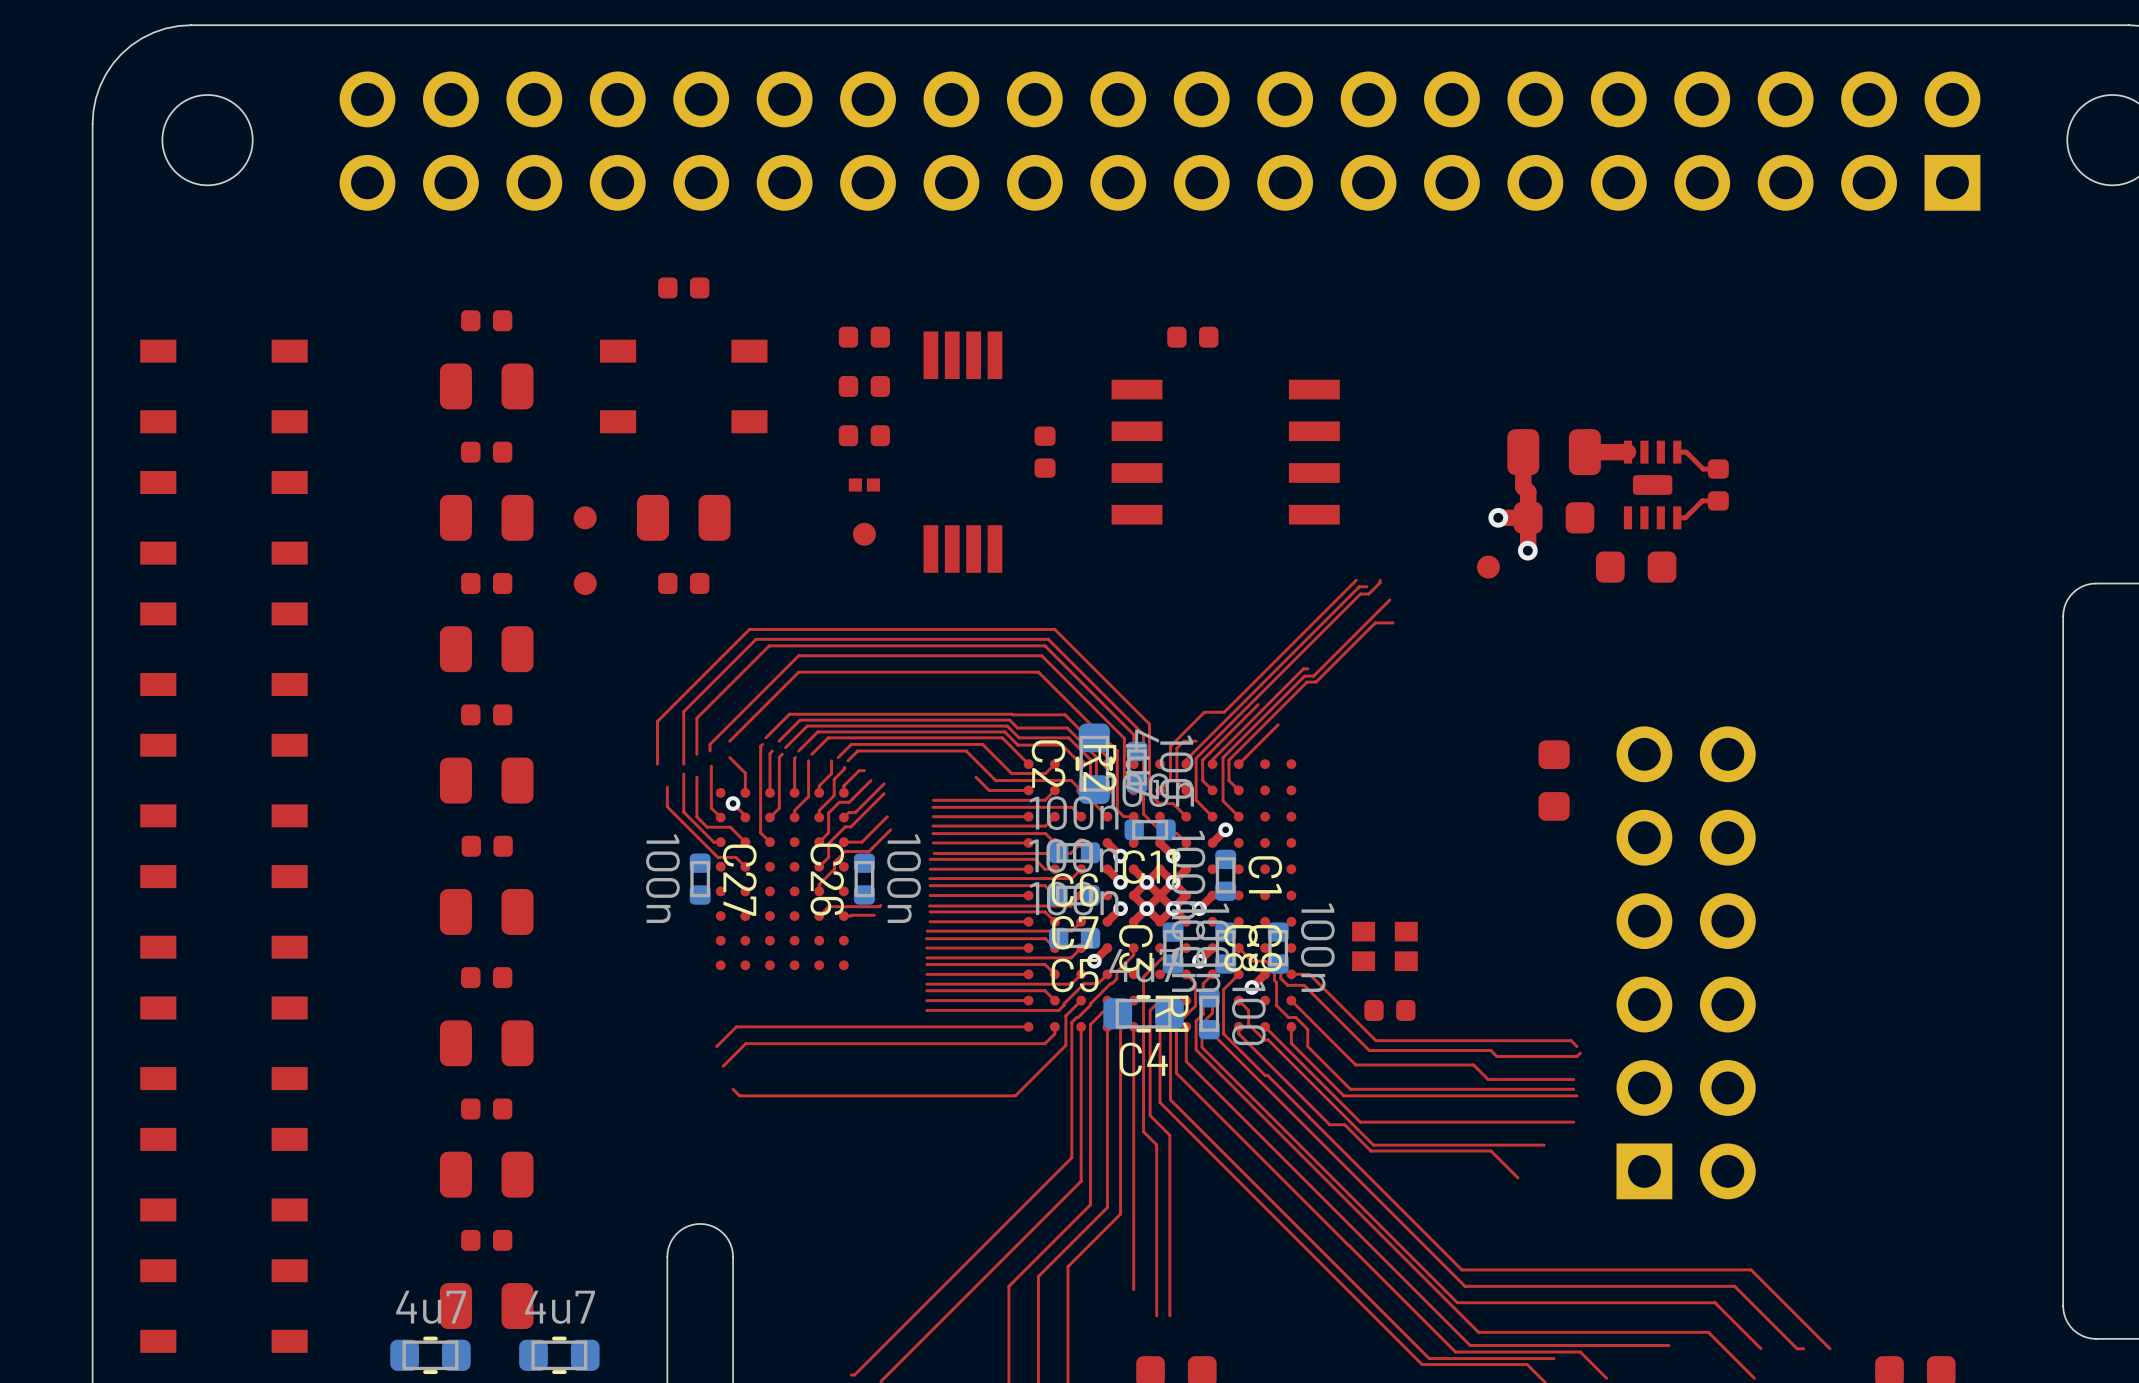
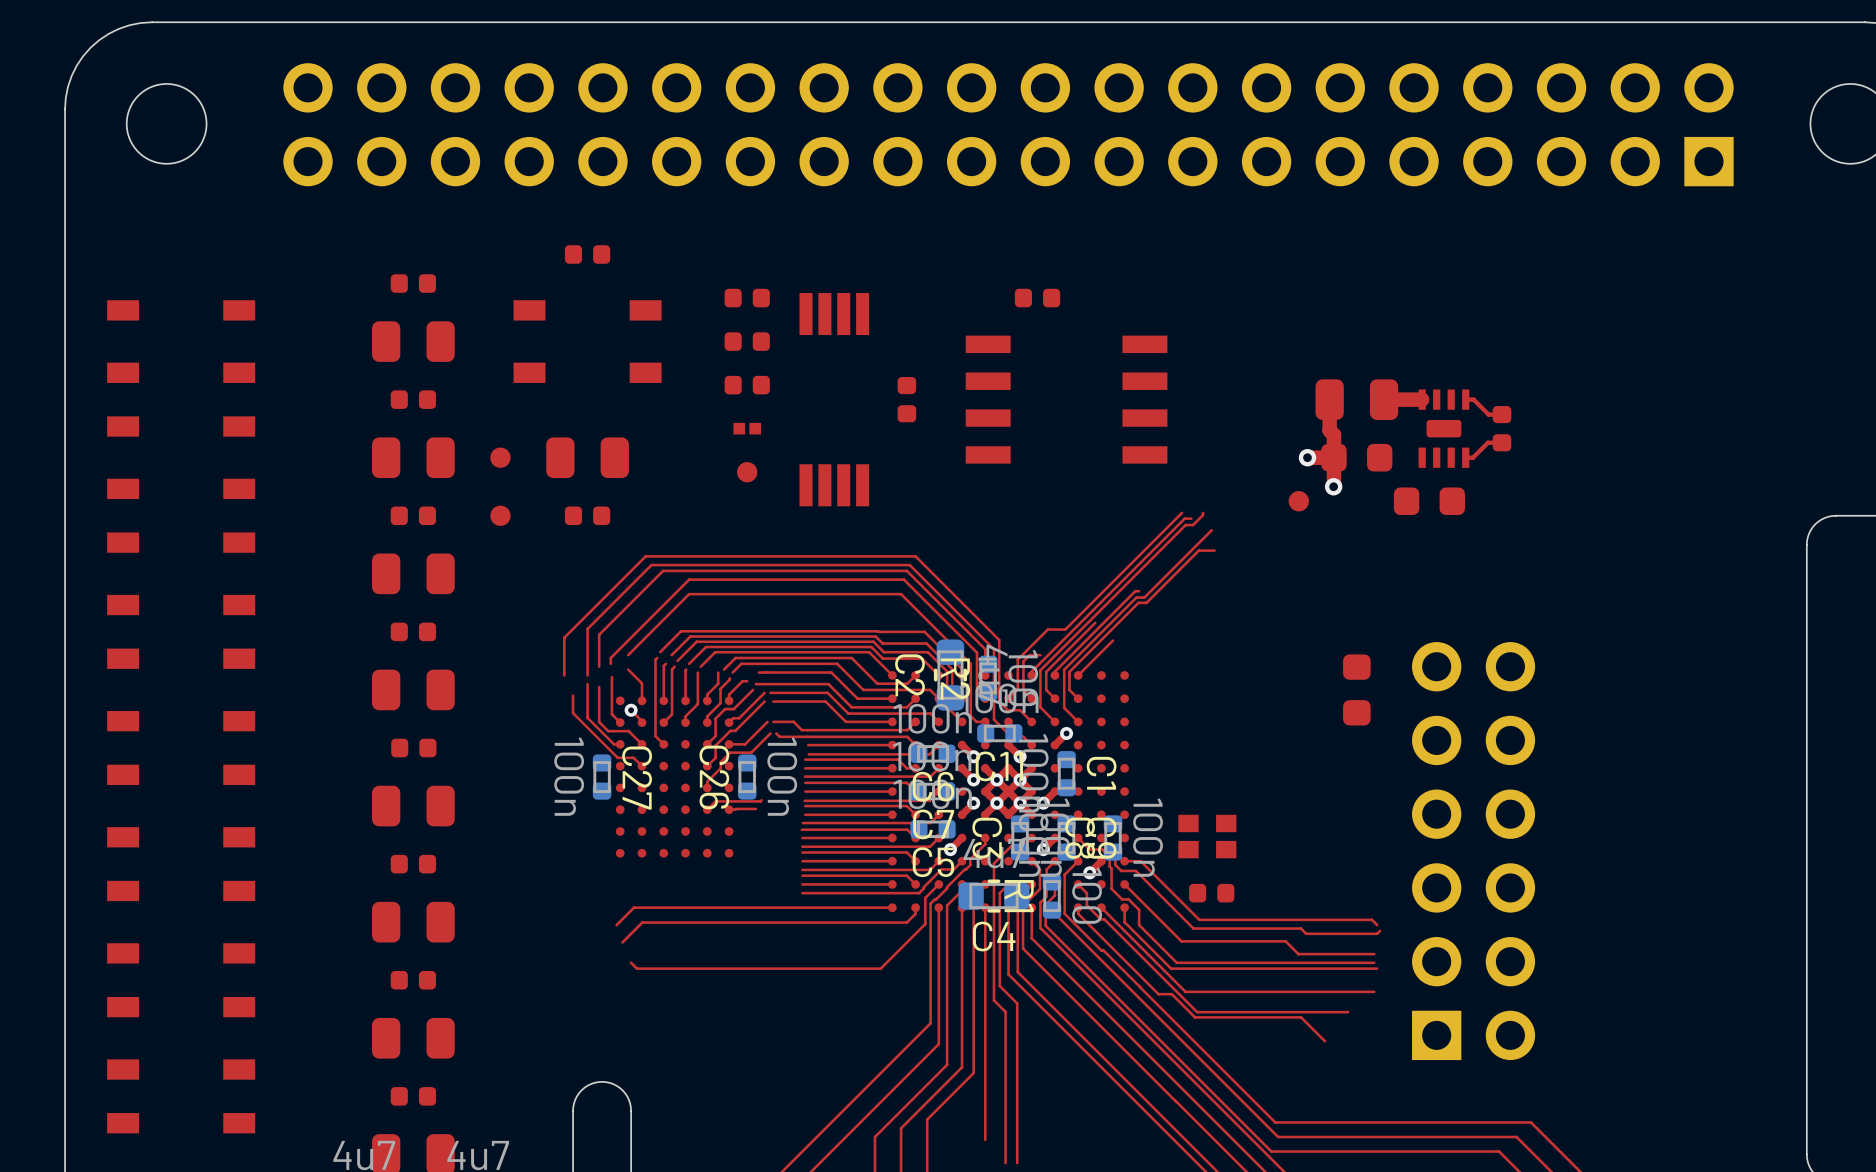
top track: none -> (758, 672) (831, 672) (845, 687)
top track: (982, 800) (933, 800) -> (851, 707) (828, 684) (755, 684)
top track: (978, 807) (932, 807) -> (848, 713) (827, 692) (770, 692)
top track: none -> (773, 721) (793, 721) (801, 730) (807, 730)
top track: (976, 816) (933, 816) -> (845, 721) (825, 701) (773, 701)
top track: none -> (776, 733) (779, 736) (807, 736)

